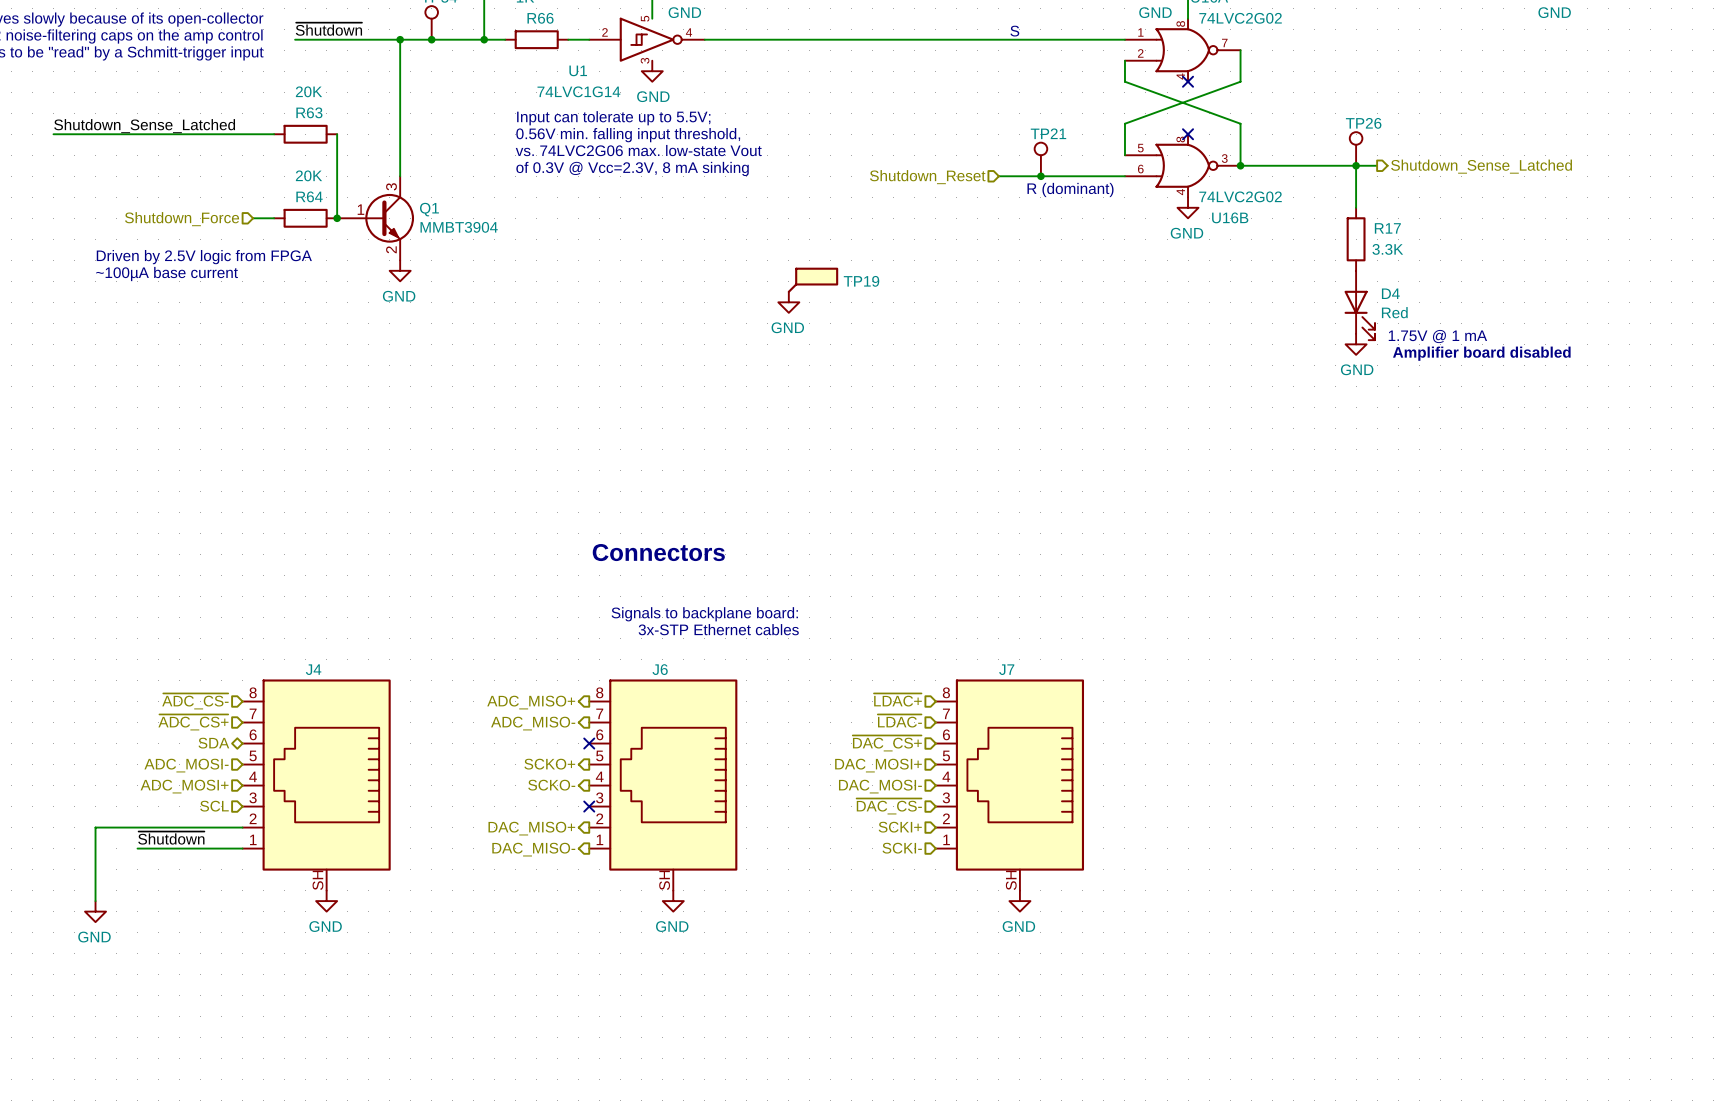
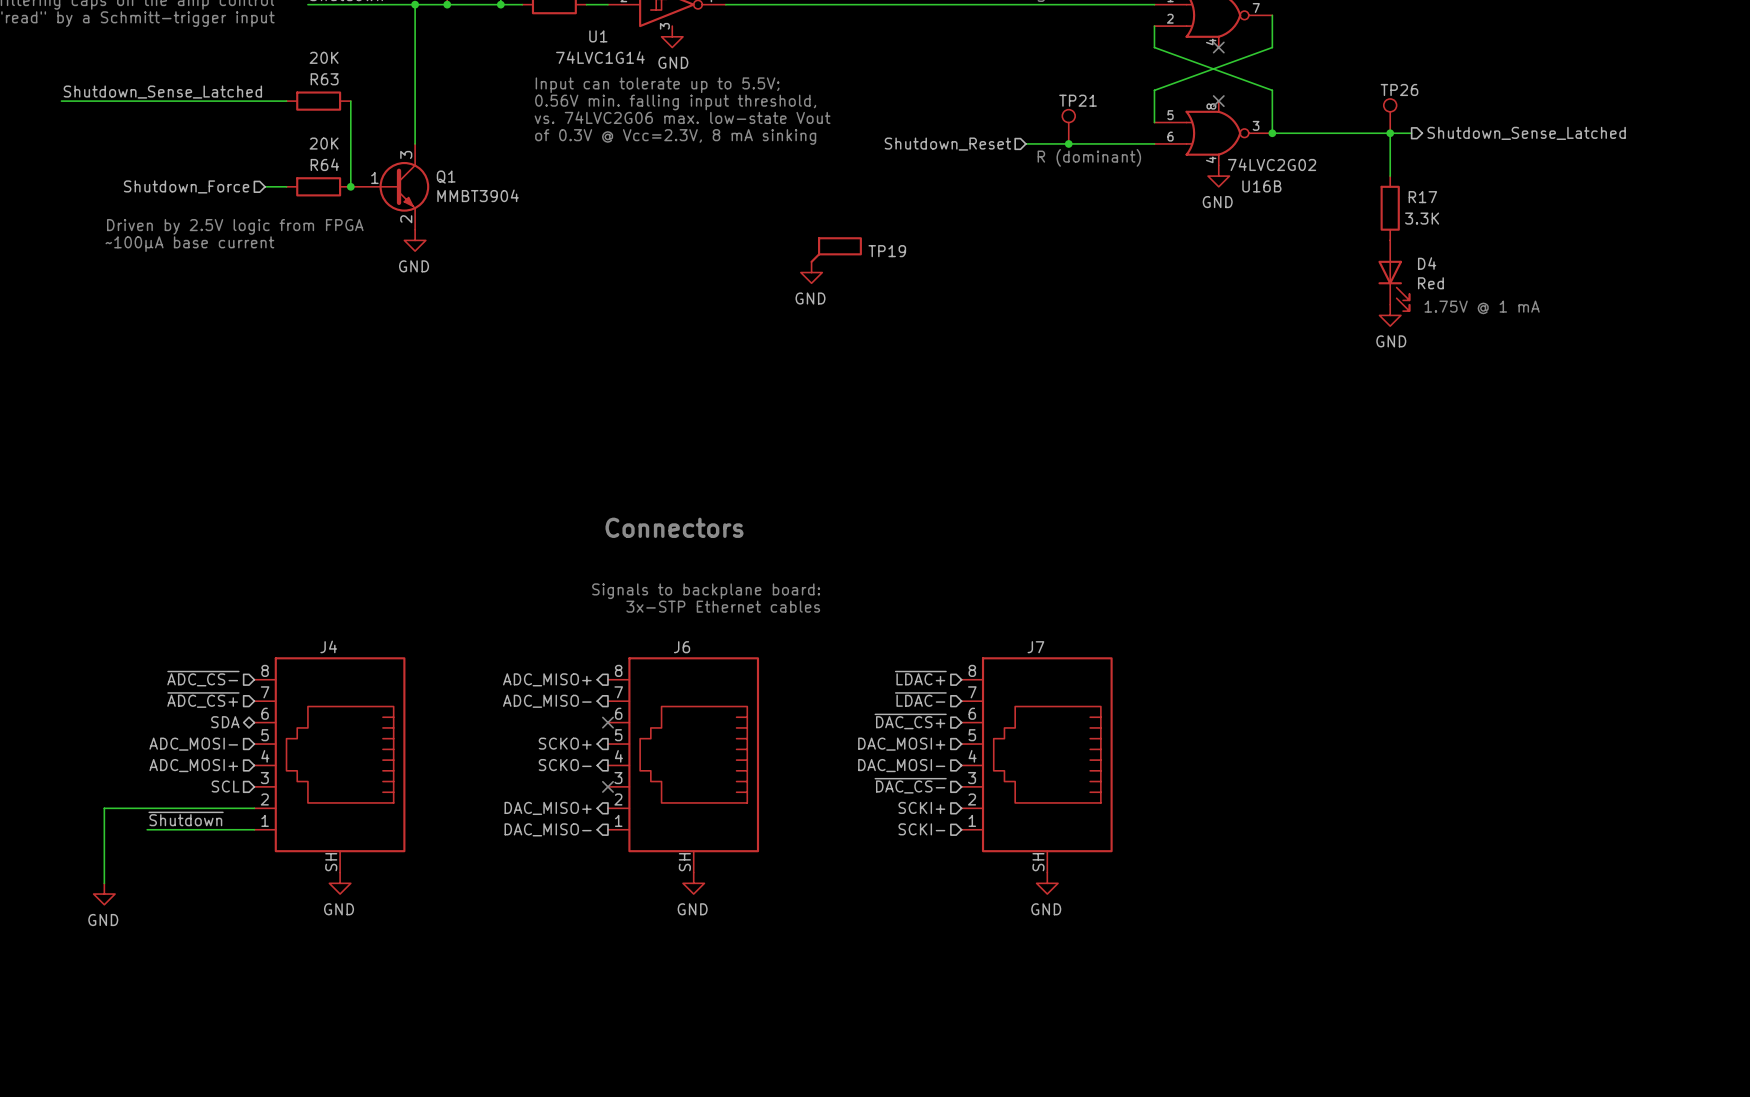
text: Amplifier board disabled (1481, 353) -> none

